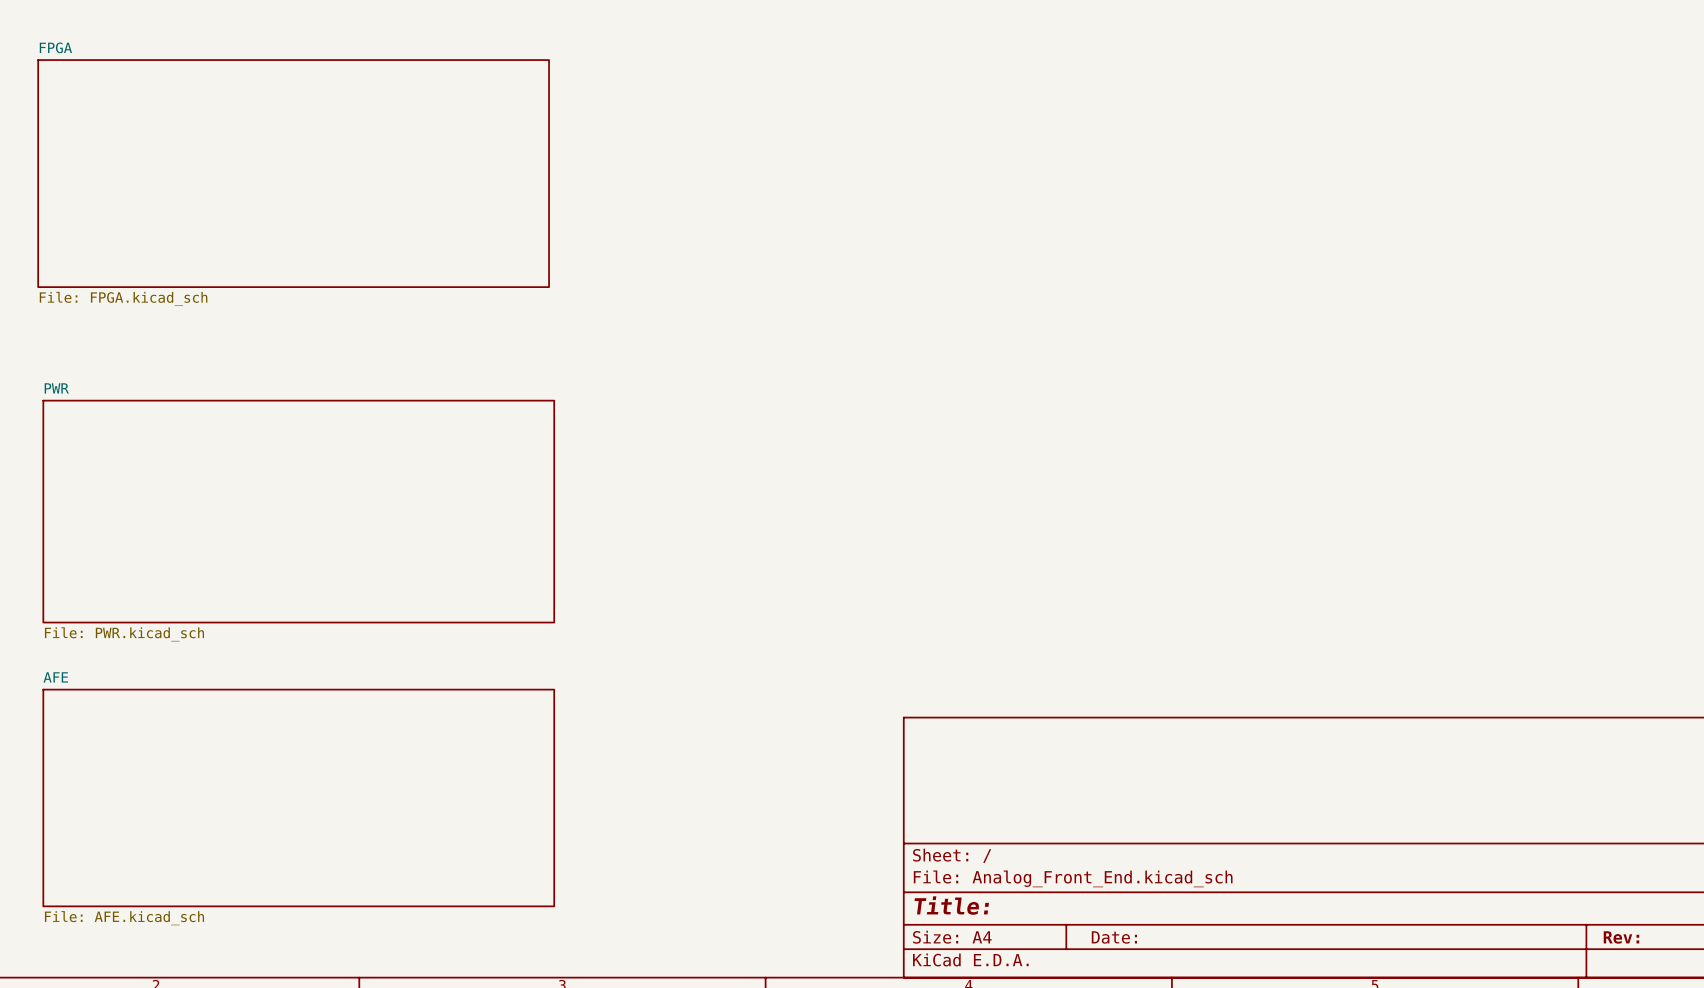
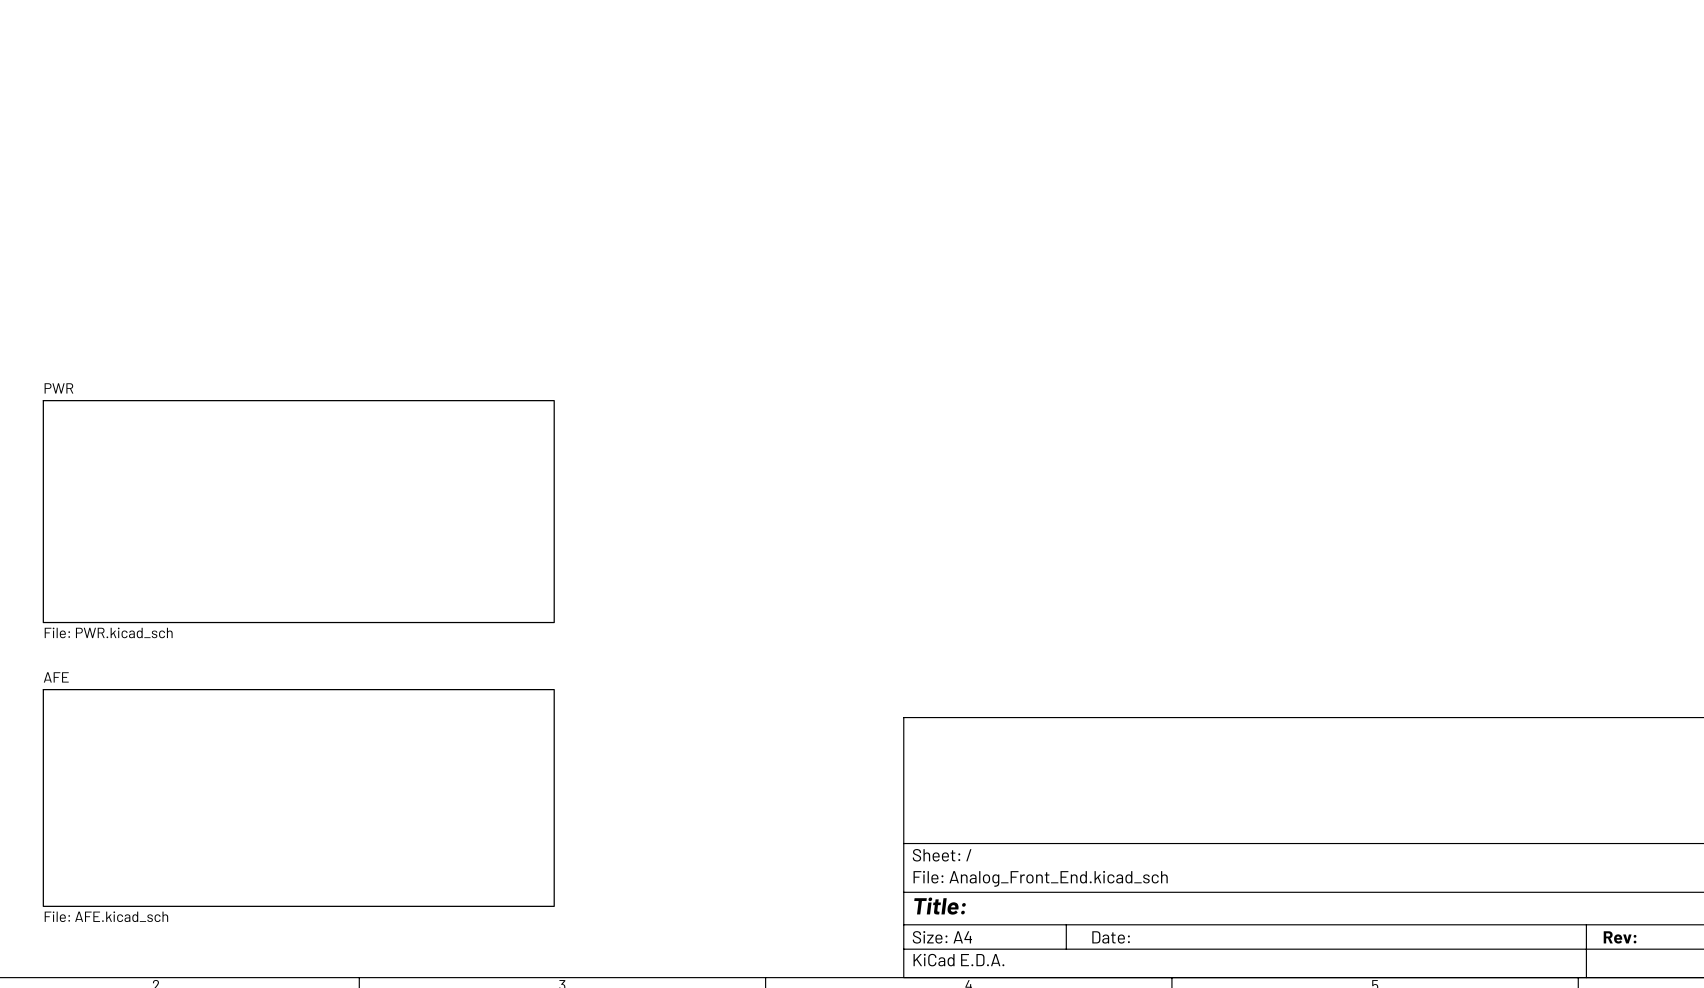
sheet FPGA: File: FPGA.kicad_sch (293, 173) -> none

